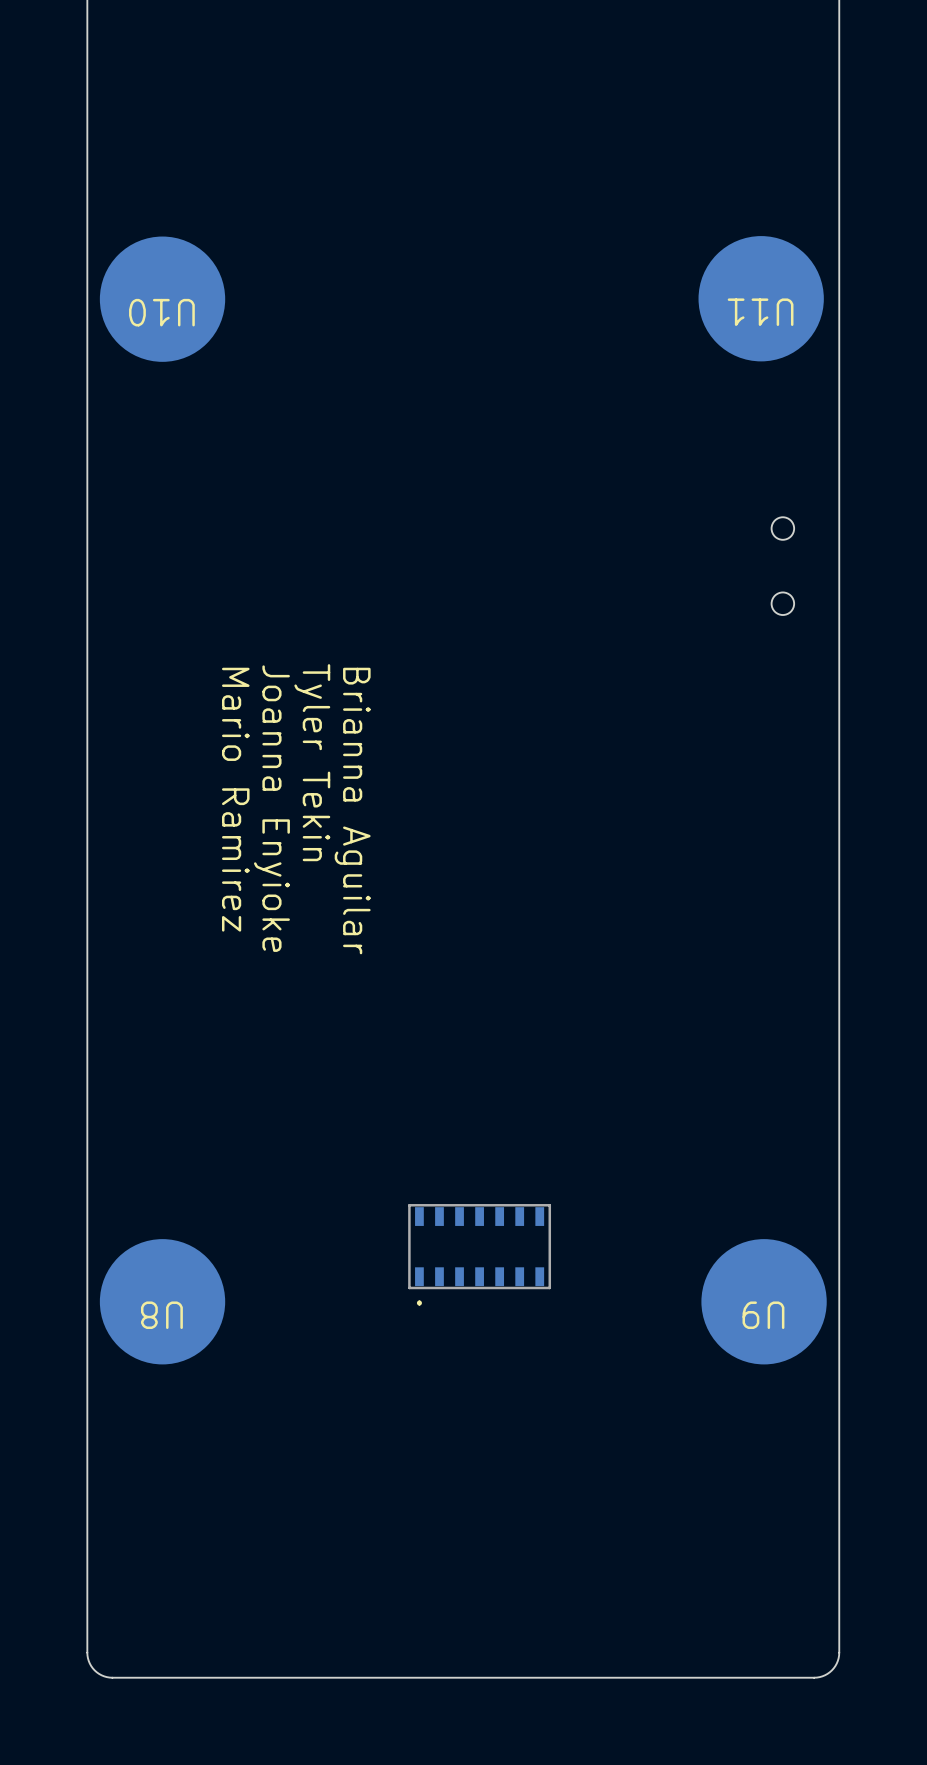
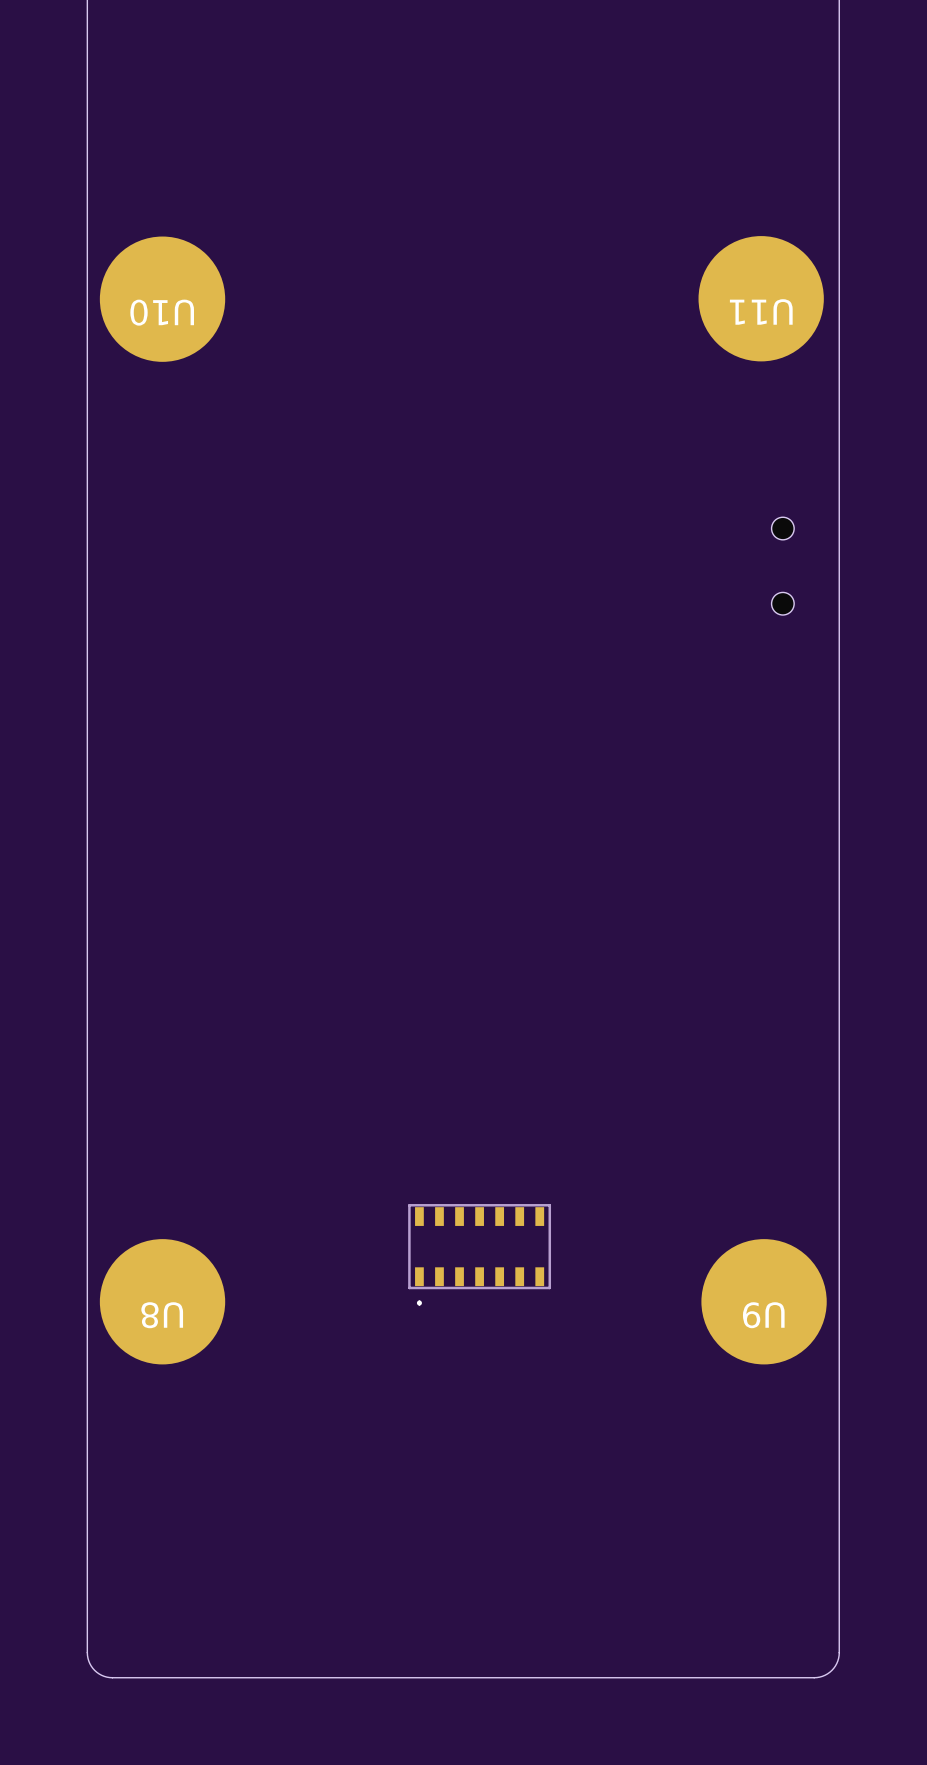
text: Tyler Tekin (312, 762) -> none
text: Mario Ramirez (235, 799) -> none
text: Joanna Enyioke (271, 808) -> none
text: Brianna Aguilar (352, 811) -> none

